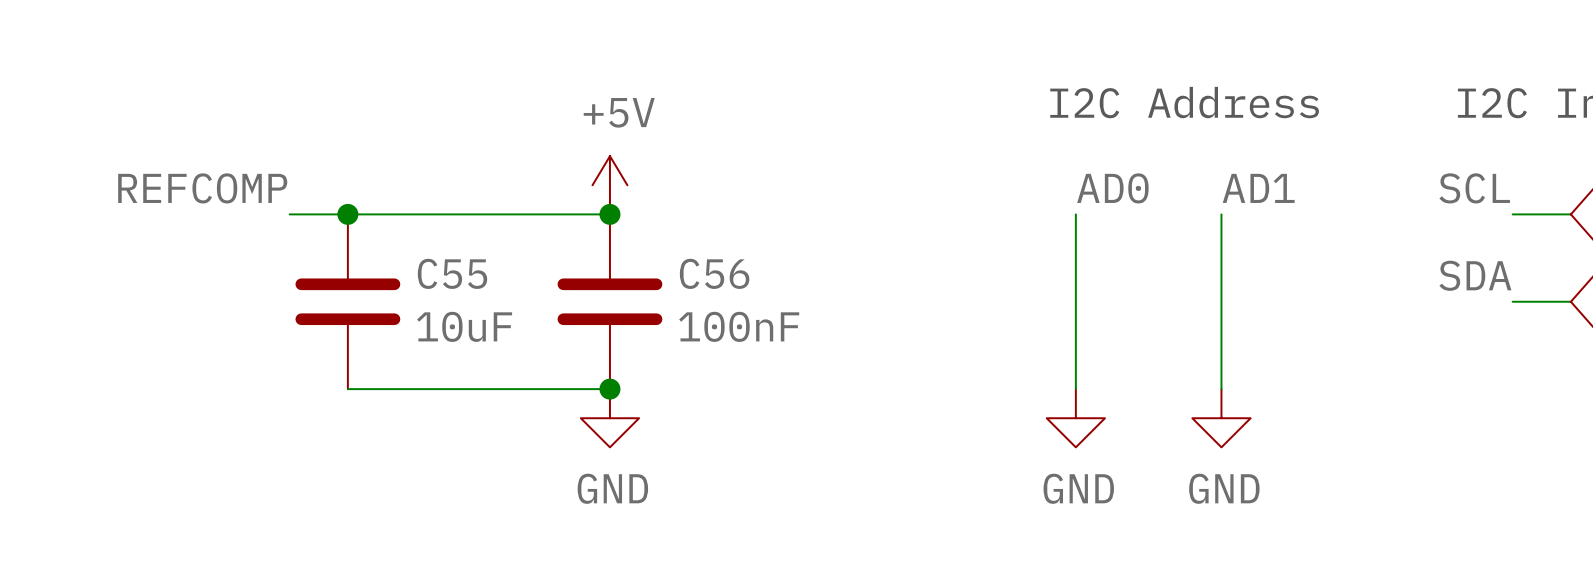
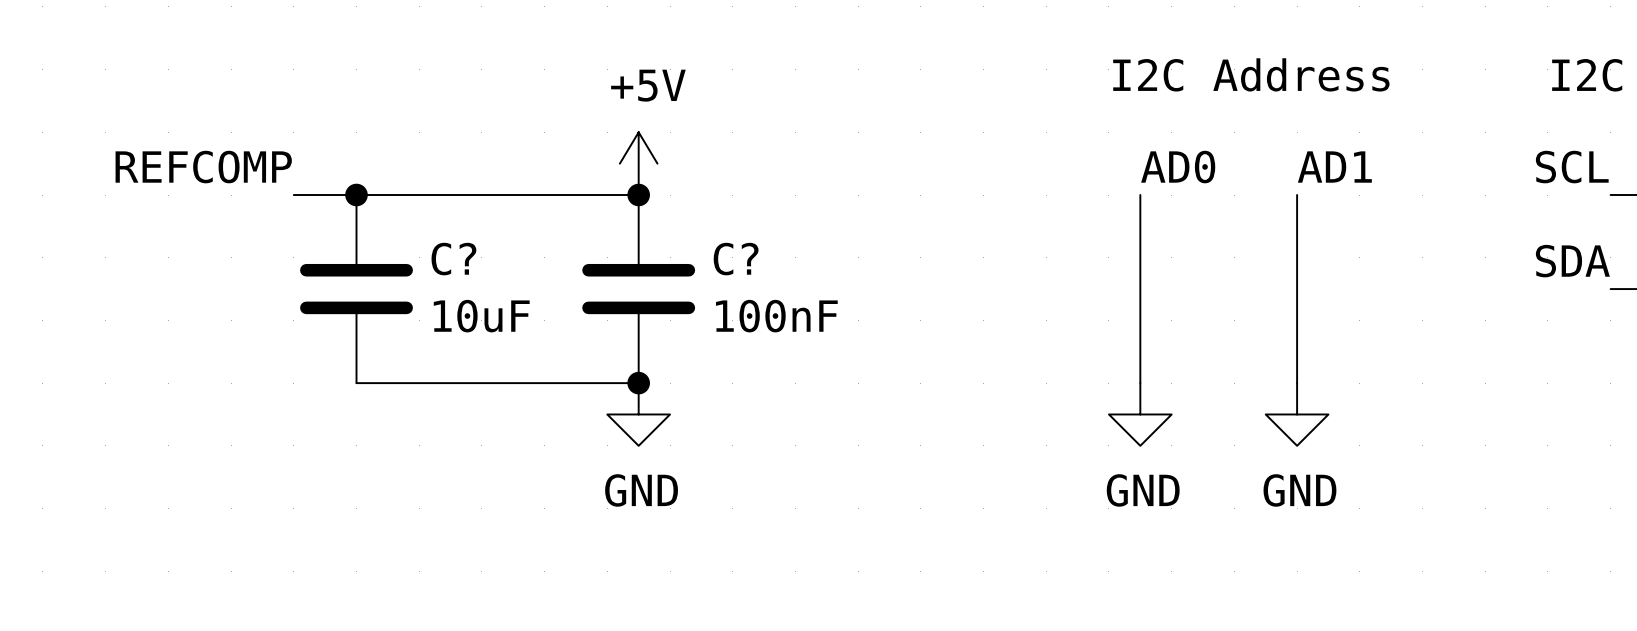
C55 name: C55 (452, 273) -> C? (453, 259)
C56 name: C56 (714, 273) -> C? (736, 259)

